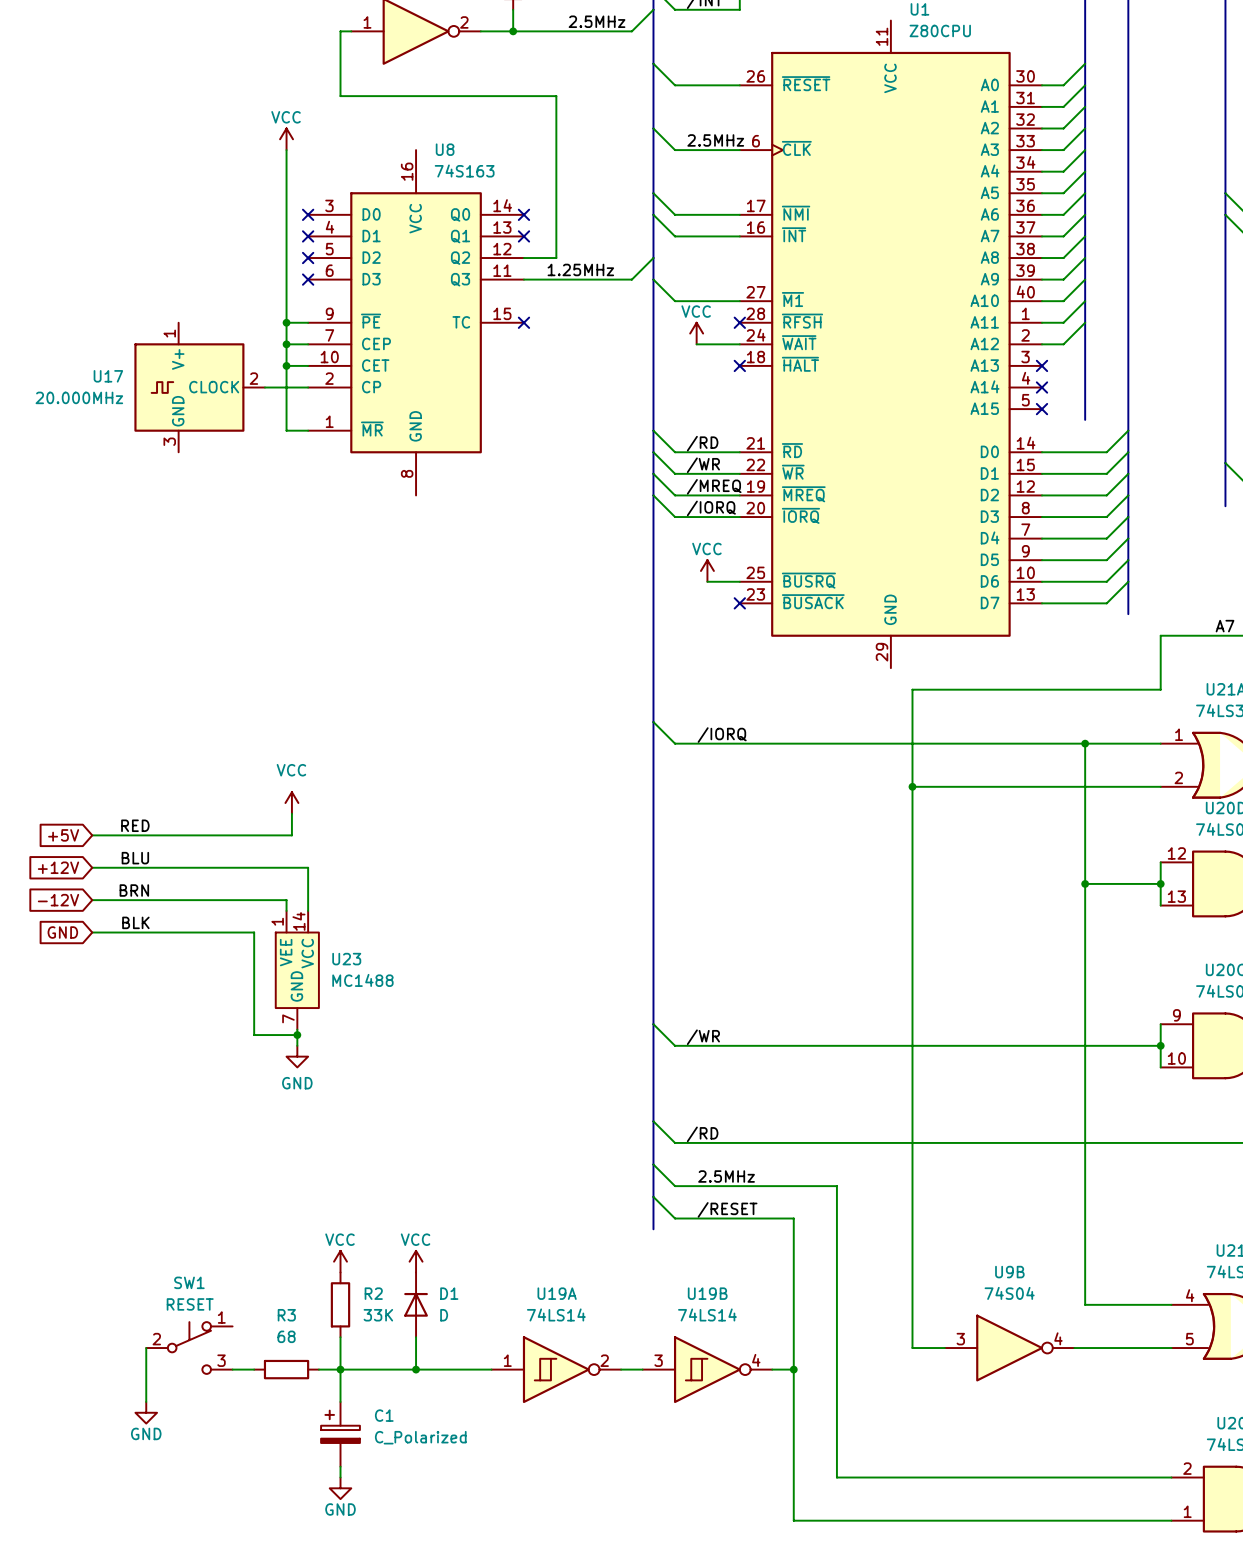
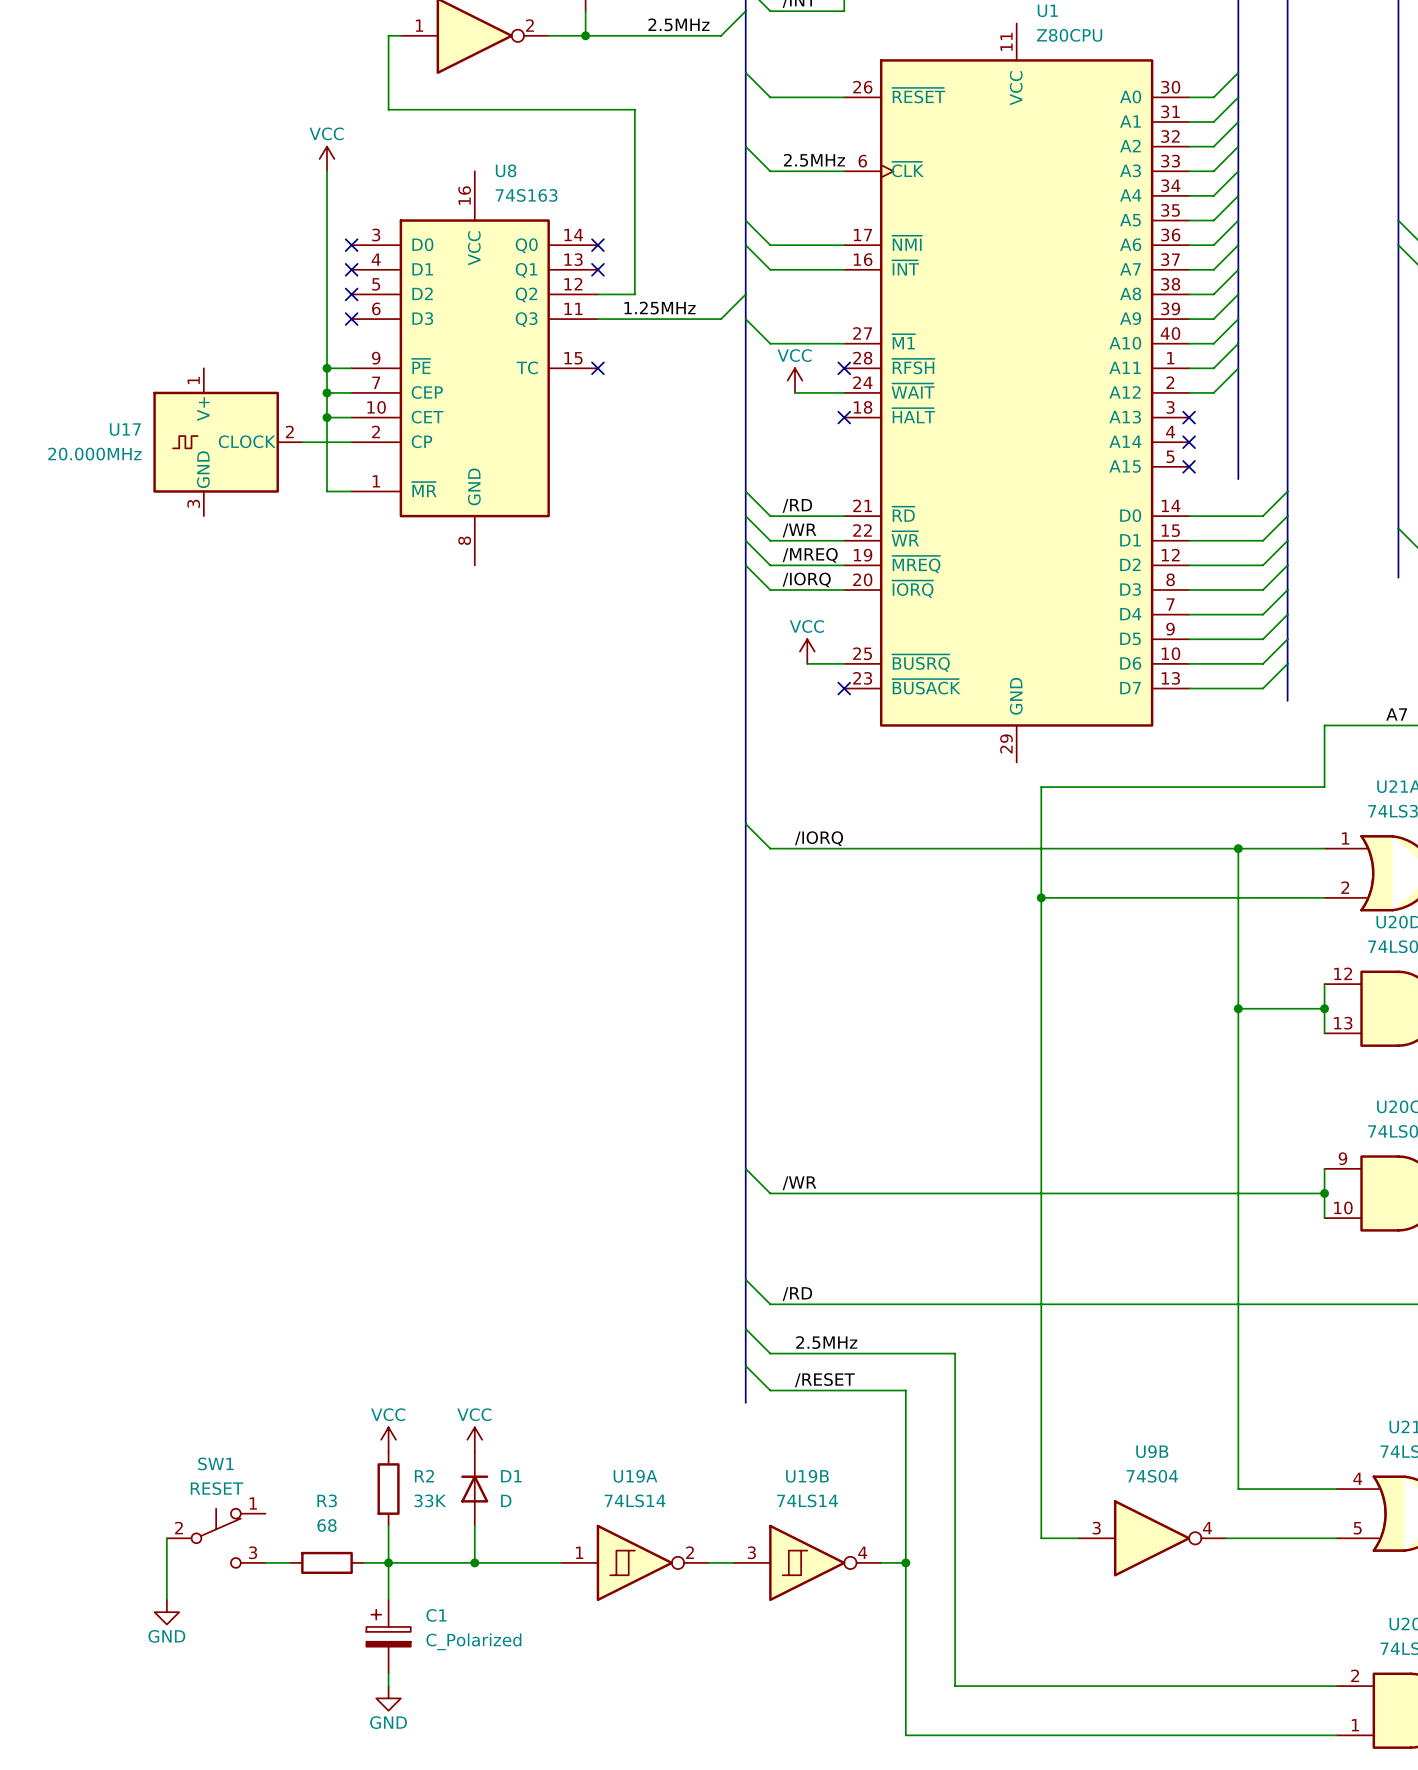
power symbol: VCC (291, 803) -> none
wire: (291, 813) (291, 835) (92, 835) -> none
label: RED (135, 825) -> none
global label: +5V (63, 835) -> none
label: BLU (135, 858) -> none
global label: +12V (58, 867) -> none
wire: (92, 867) (308, 867) (308, 910) -> none
label: BRN (134, 890) -> none
global label: -12V (58, 900) -> none
wire: (92, 900) (286, 900) (286, 910) -> none
label: BLK (135, 922) -> none
global label: GND (62, 932) -> none
wire: (92, 932) (254, 932) (254, 1035) (297, 1035) -> none
U23: MC1488 (297, 970) -> none
wire: (297, 1029) (297, 1045) -> none
junction: (297, 1035) -> none
power symbol: GND (297, 1056) -> none

